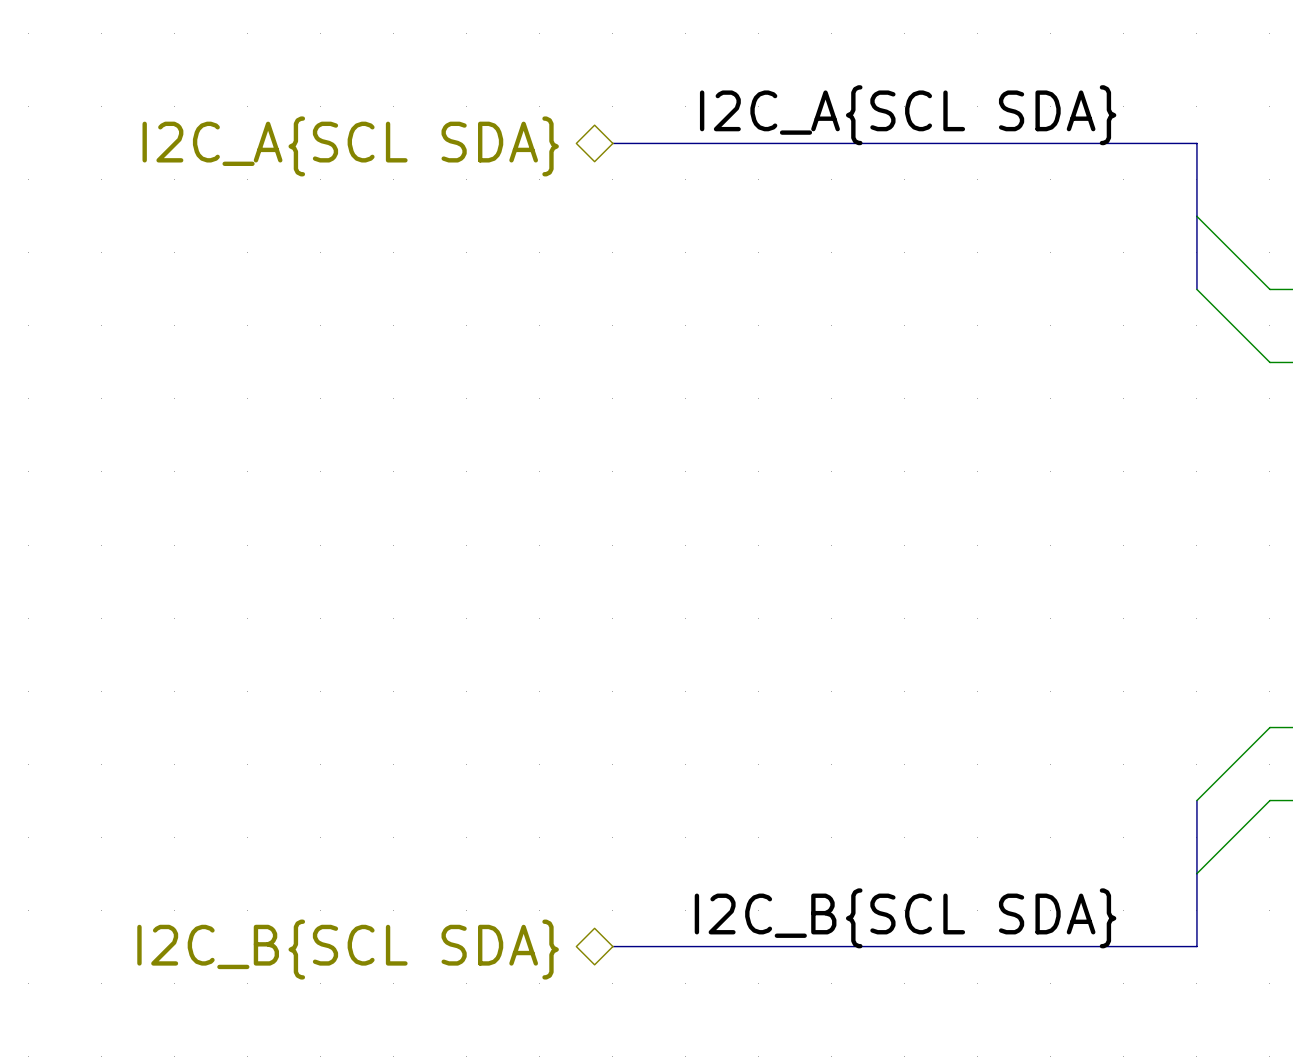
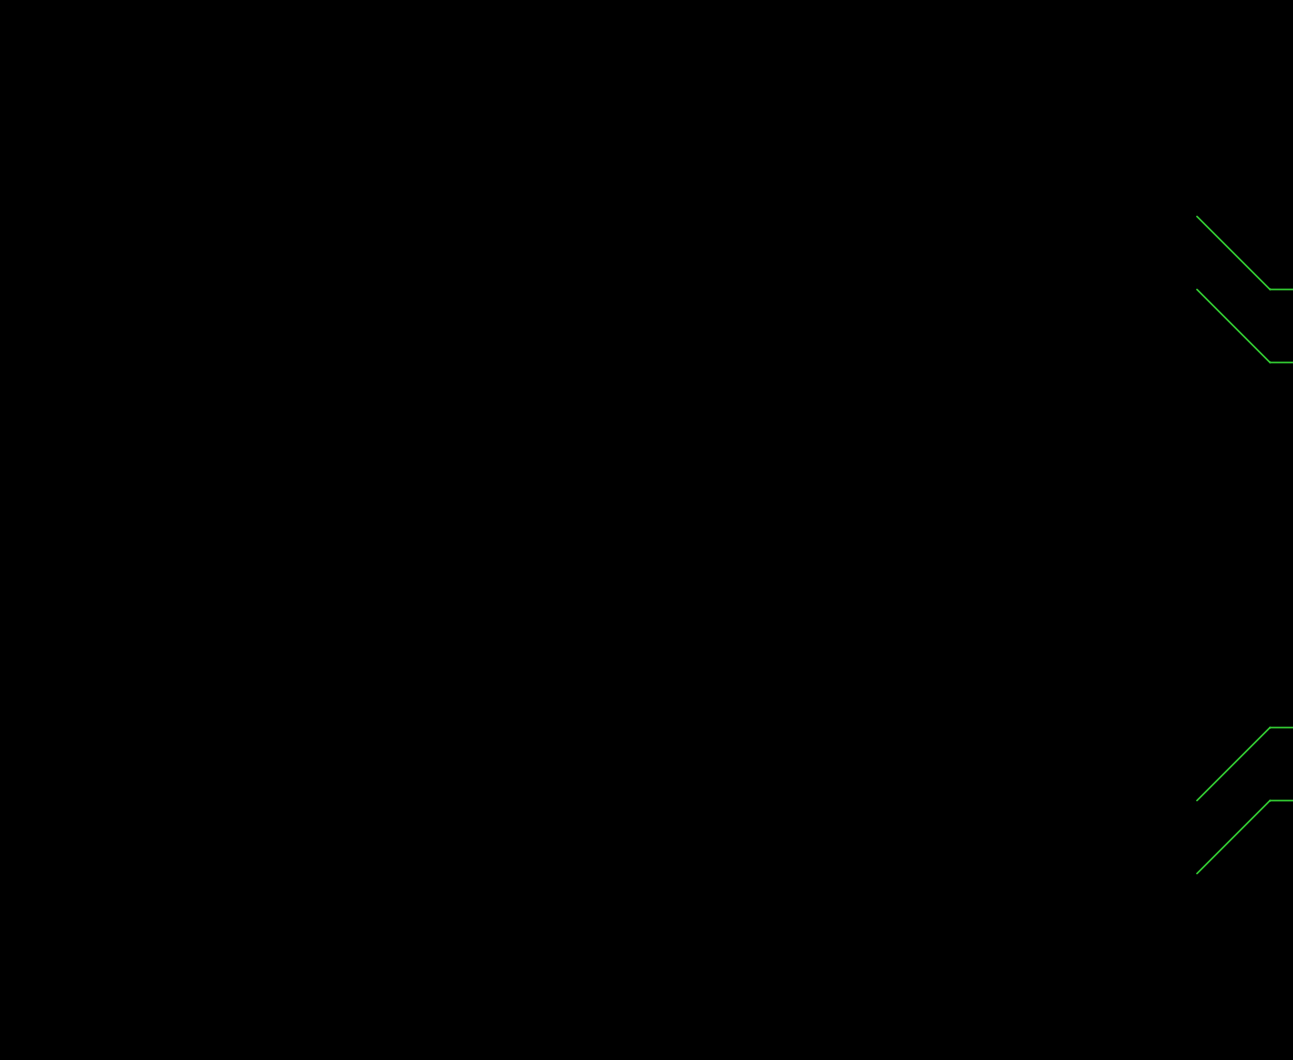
label: I2C_A{SCL SDA} (908, 115) -> none
bus: (612, 143) (1196, 143) (1196, 289) -> none
hierarchical label: I2C_A{SCL SDA} (350, 146) -> none
bus: (1196, 800) (1196, 946) (612, 946) -> none
label: I2C_B{SCL SDA} (905, 918) -> none
hierarchical label: I2C_B{SCL SDA} (348, 949) -> none

